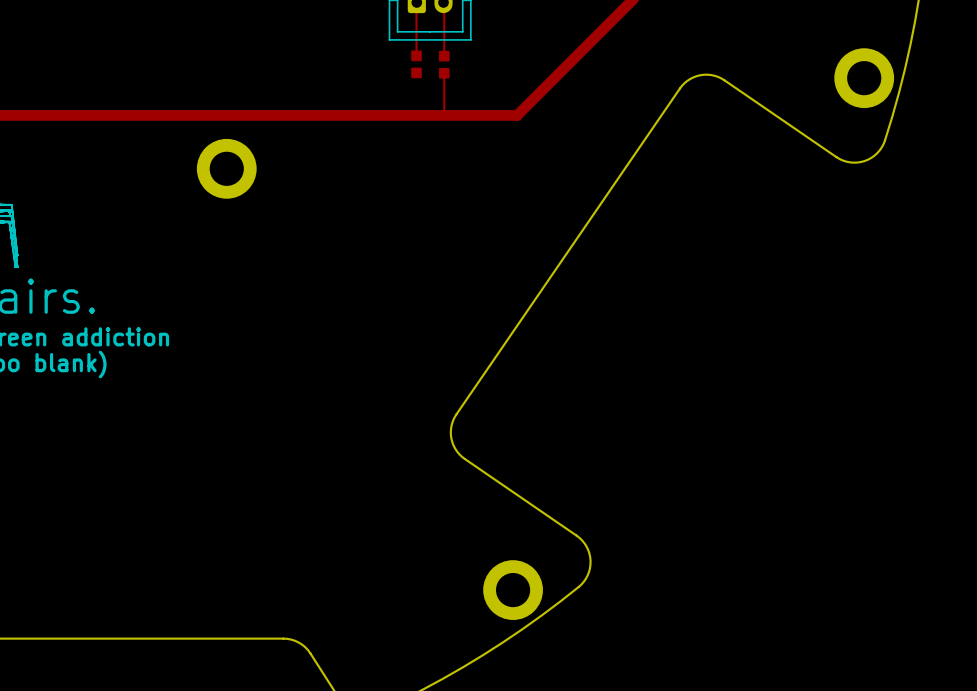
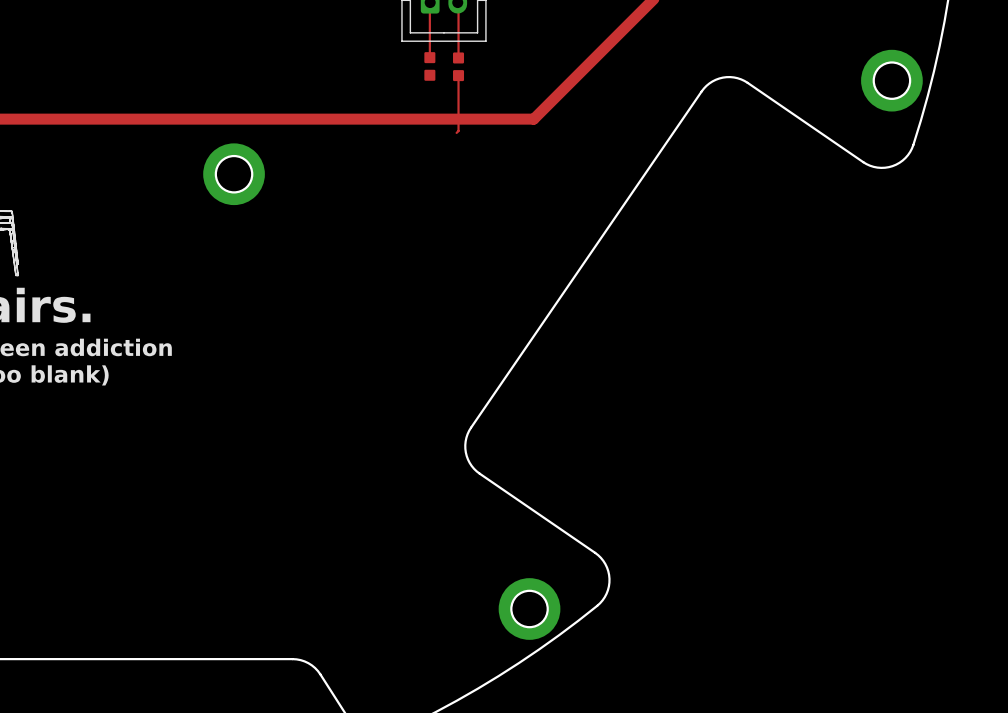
round board edge: none -> [872, 61, 912, 100]
top track: none -> (458, 119) (458, 131) (456, 132)
round board edge: none -> [214, 154, 254, 194]
round board edge: none -> [510, 589, 549, 629]

